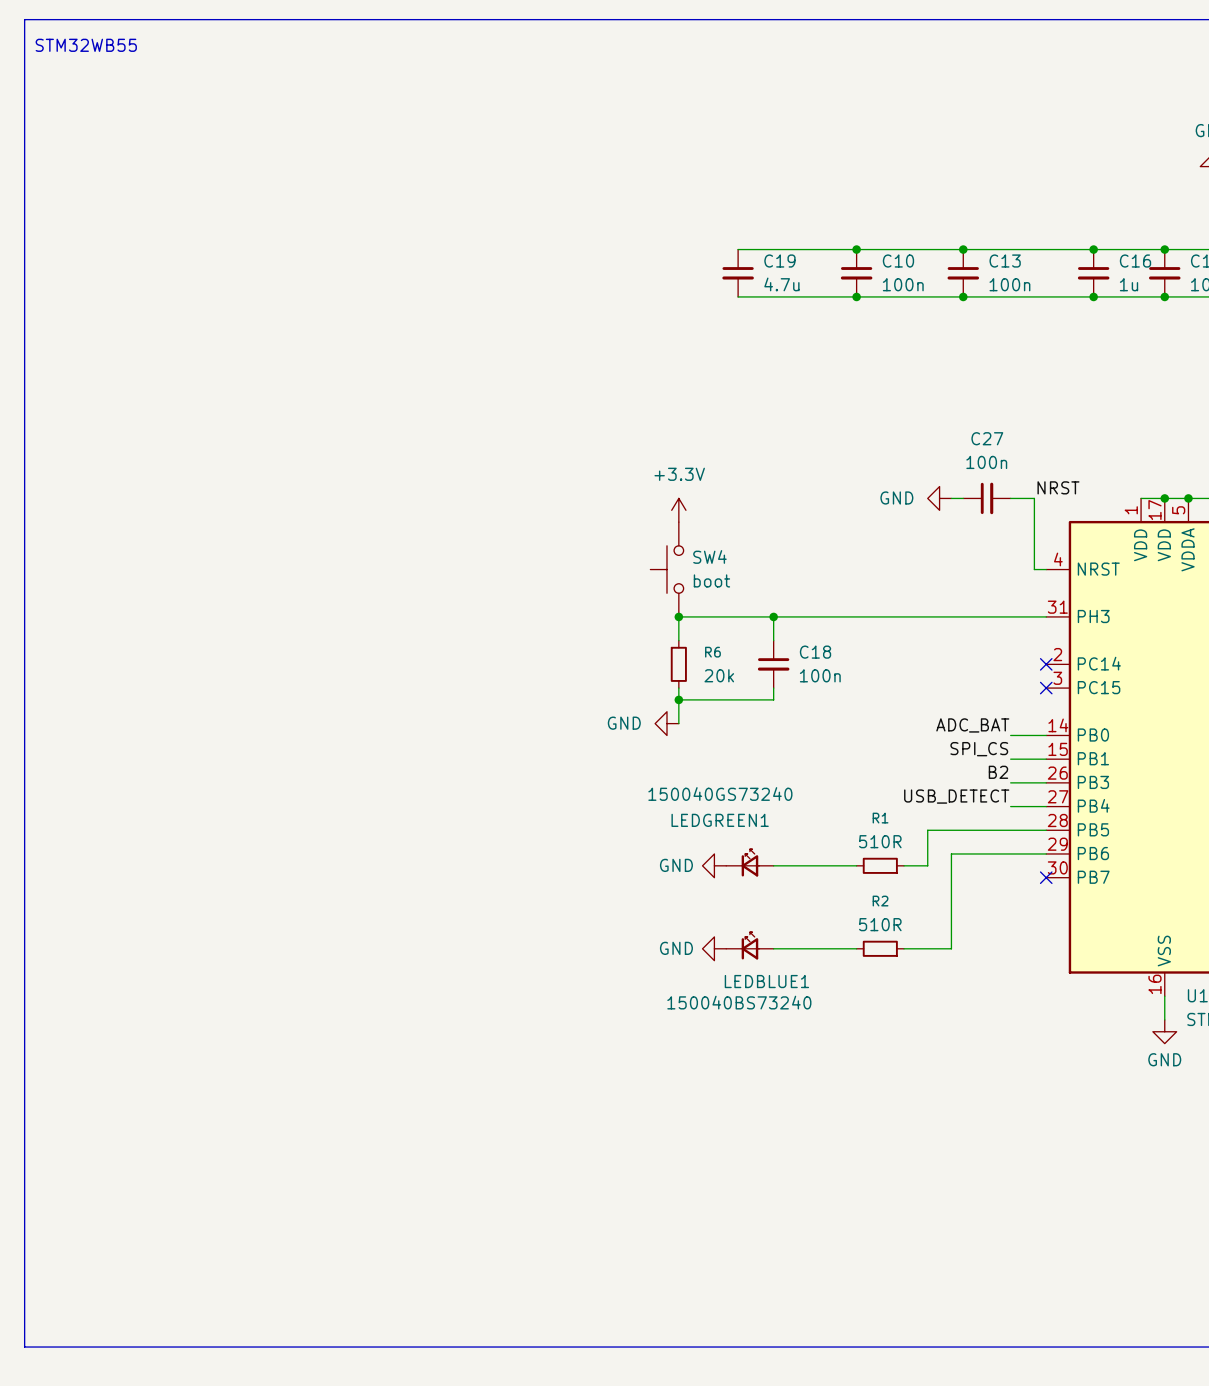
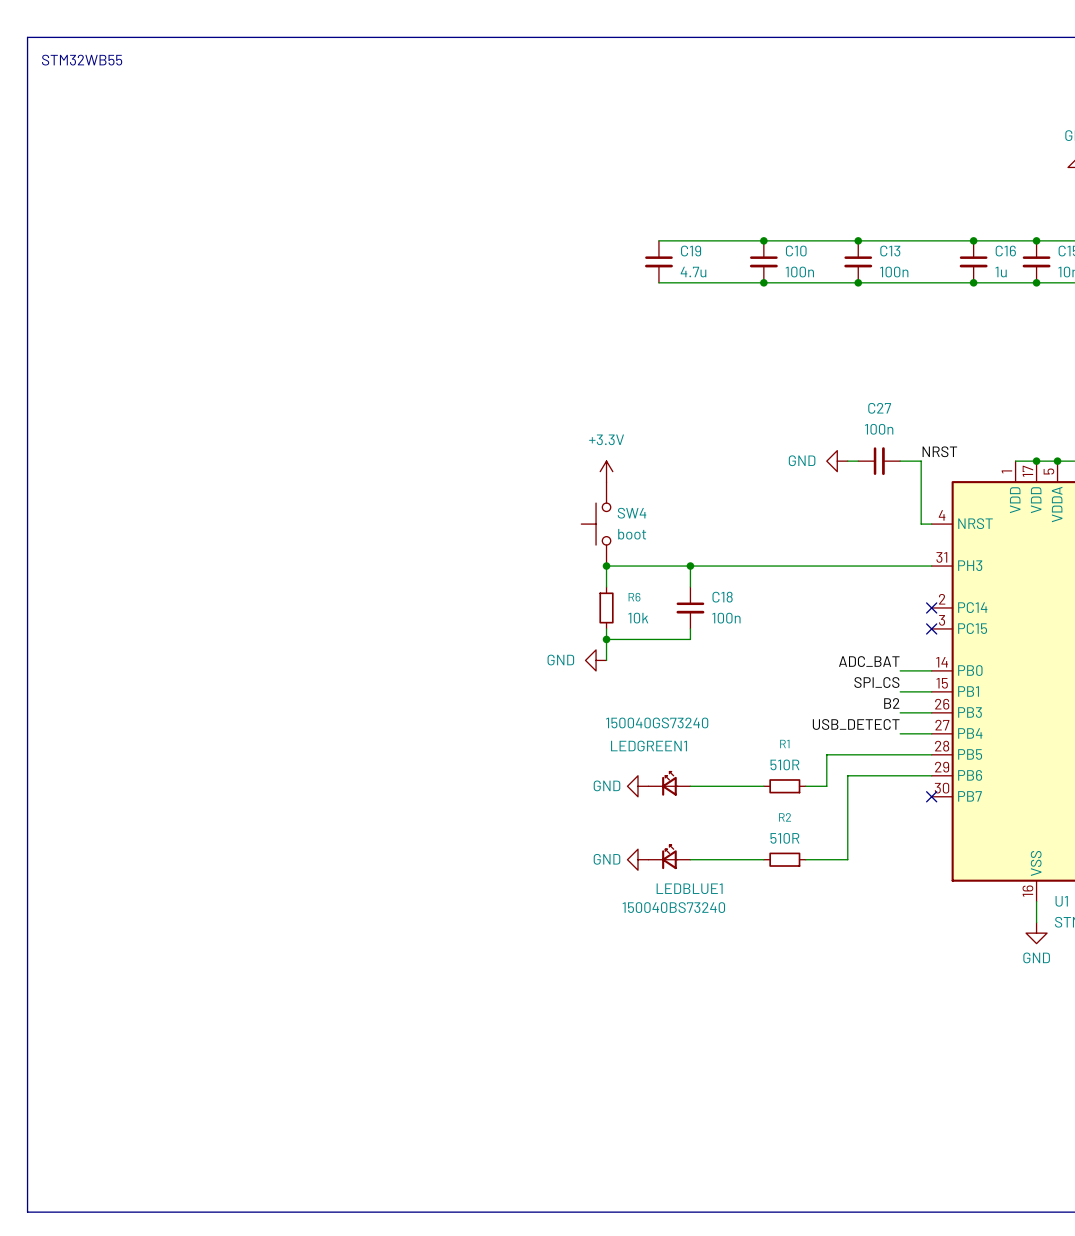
R6 value: 20k (719, 675) -> 10k (638, 618)

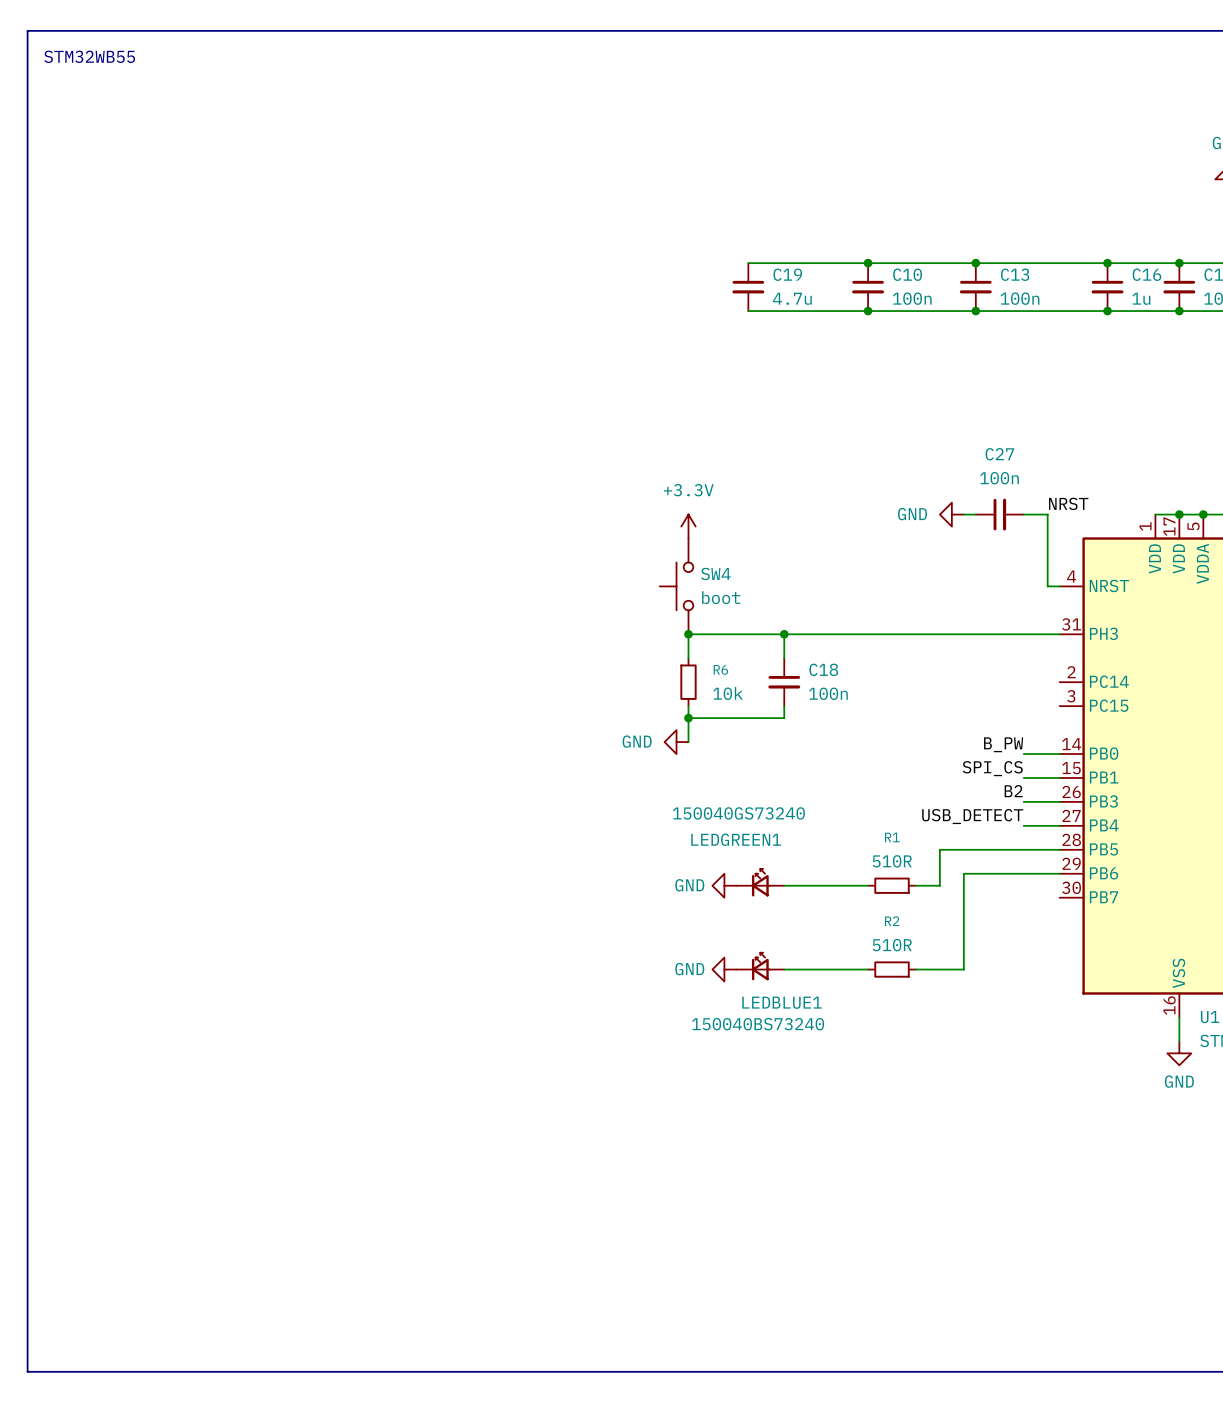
no-connect mark: (931, 607) -> none
no-connect mark: (931, 628) -> none
label: ADC_BAT (869, 661) -> B_PW (1003, 744)
no-connect mark: (931, 796) -> none

